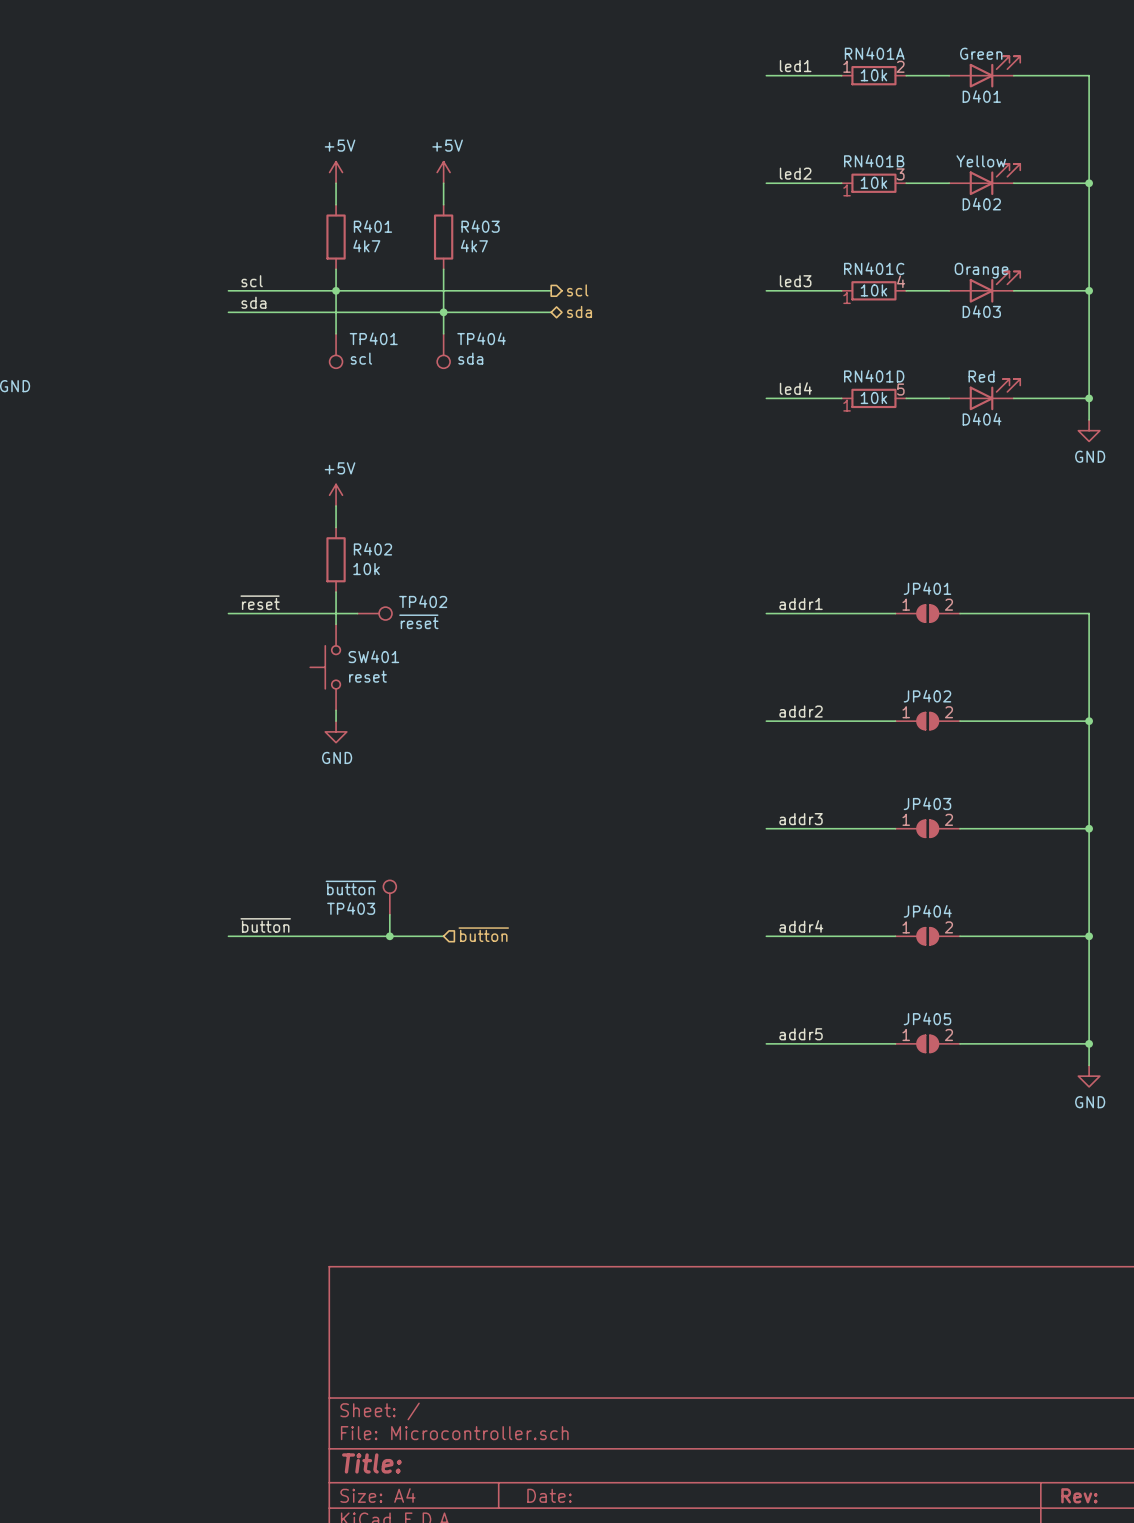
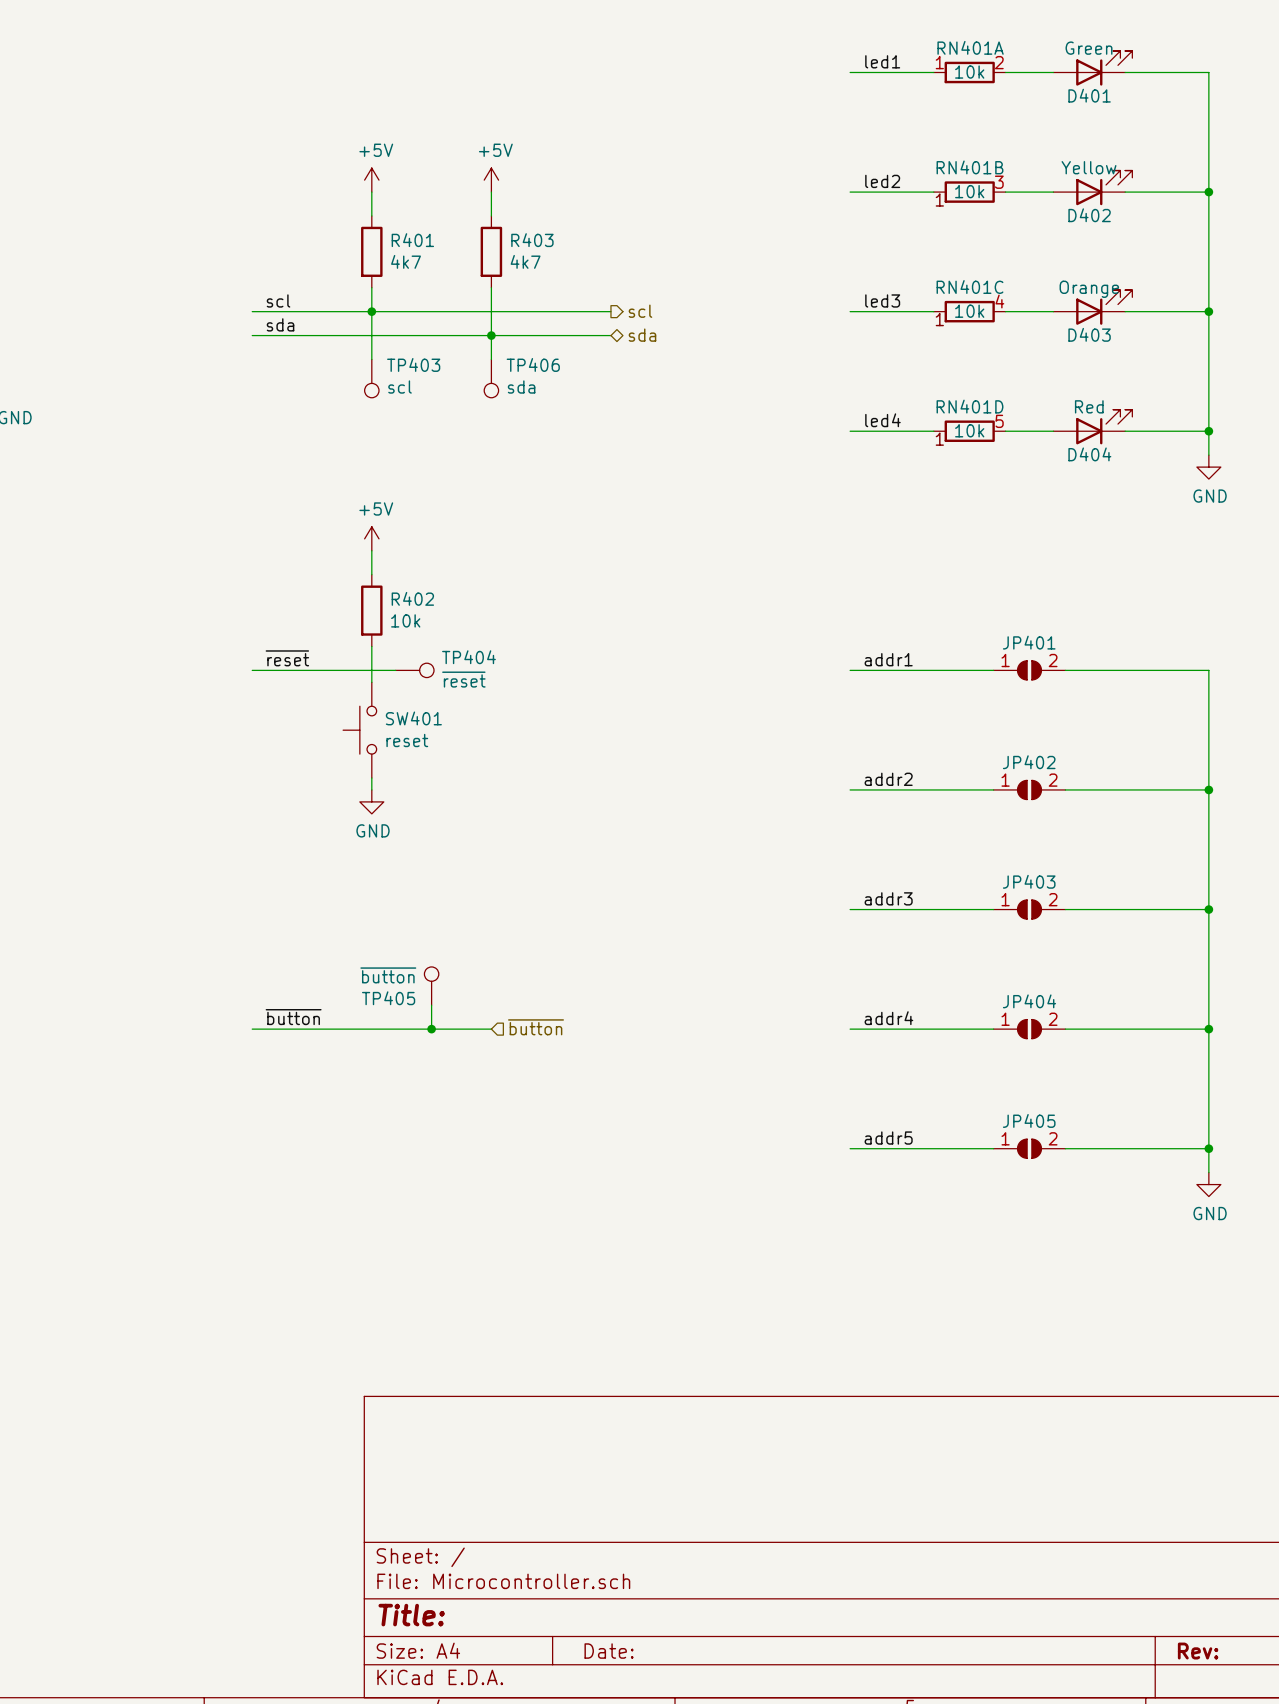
TP401 name: TP401 (373, 338) -> TP403 (413, 364)
TP404 name: TP404 (481, 338) -> TP406 (533, 364)
TP402 name: TP402 (423, 601) -> TP404 (468, 657)
TP403 name: TP403 (351, 908) -> TP405 (388, 998)

